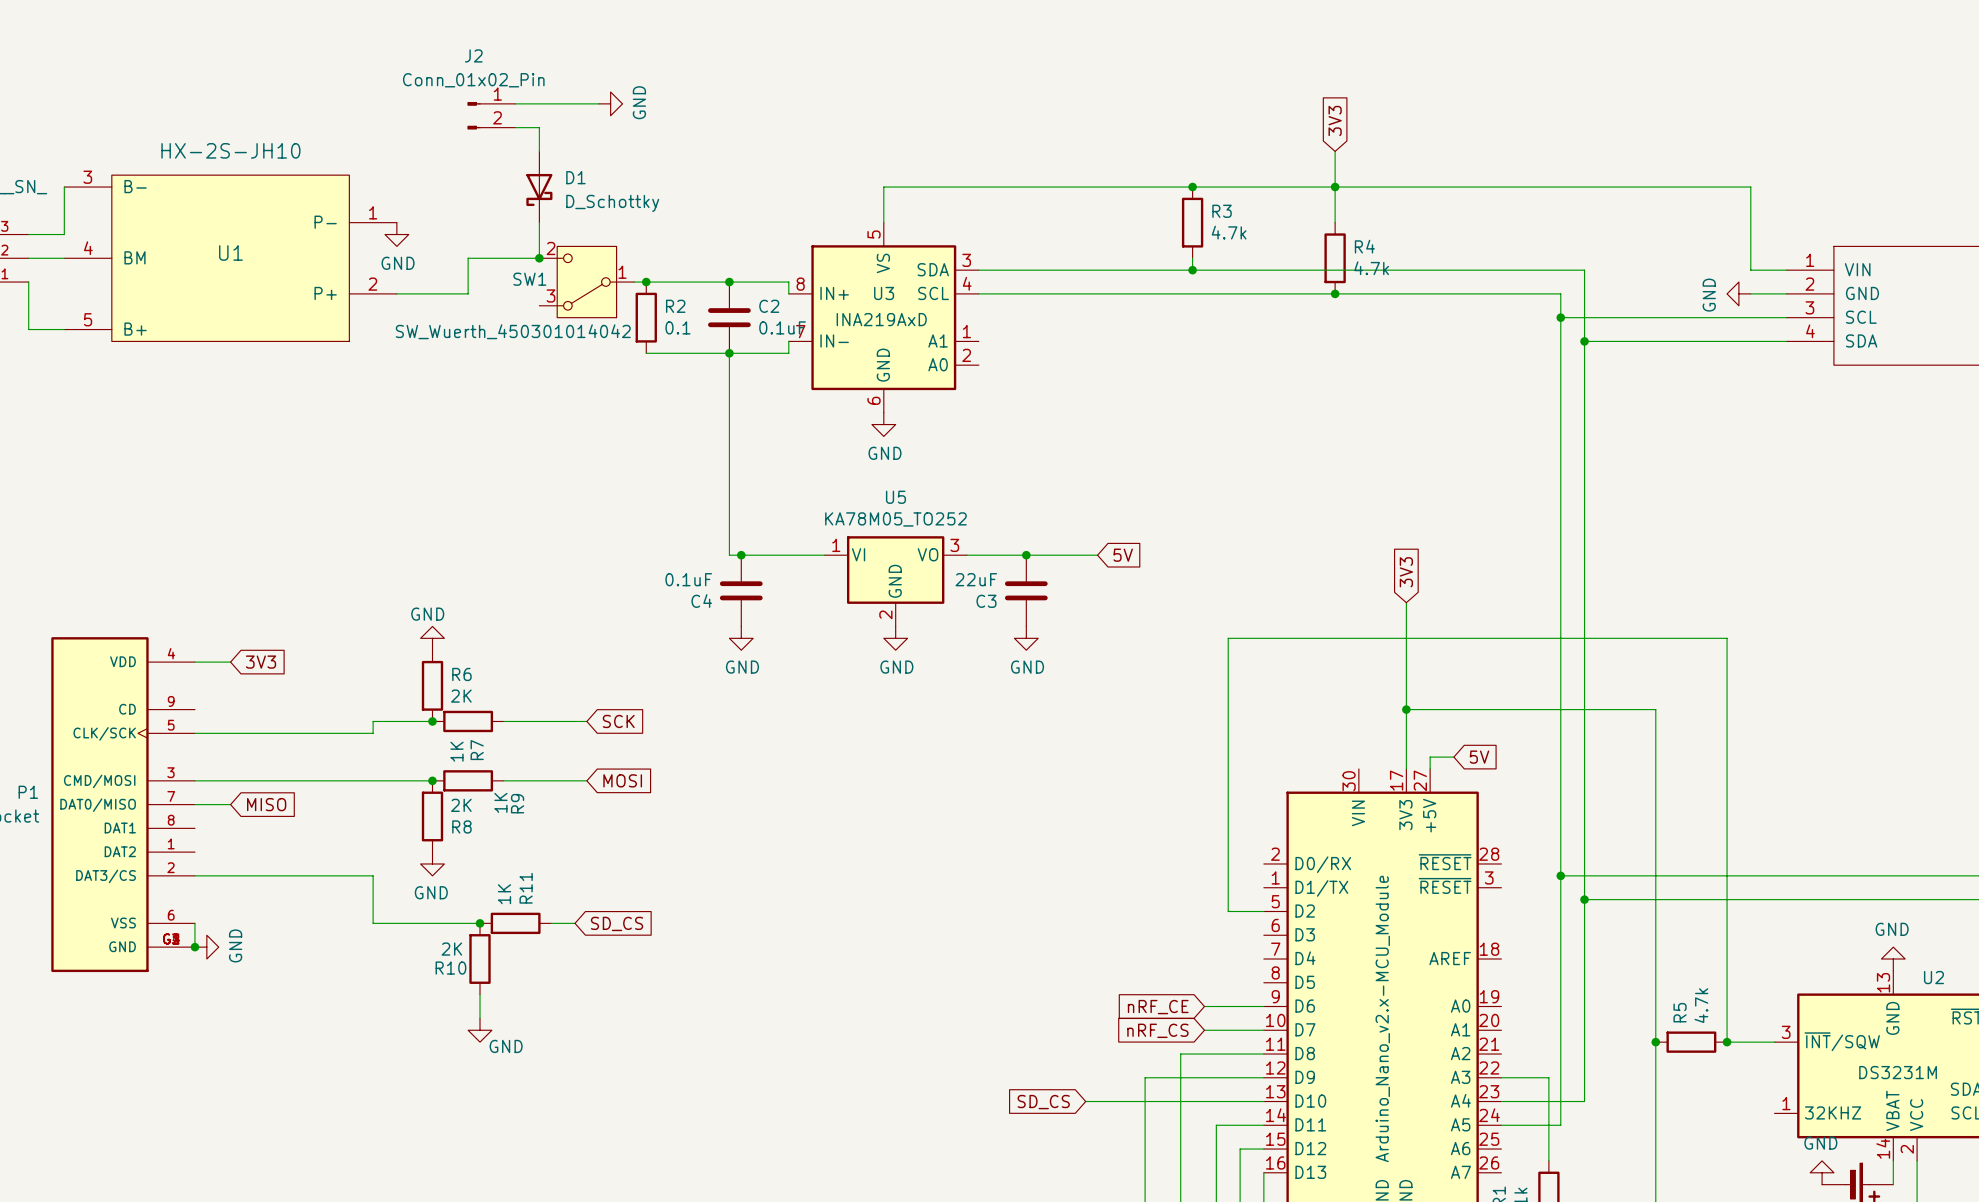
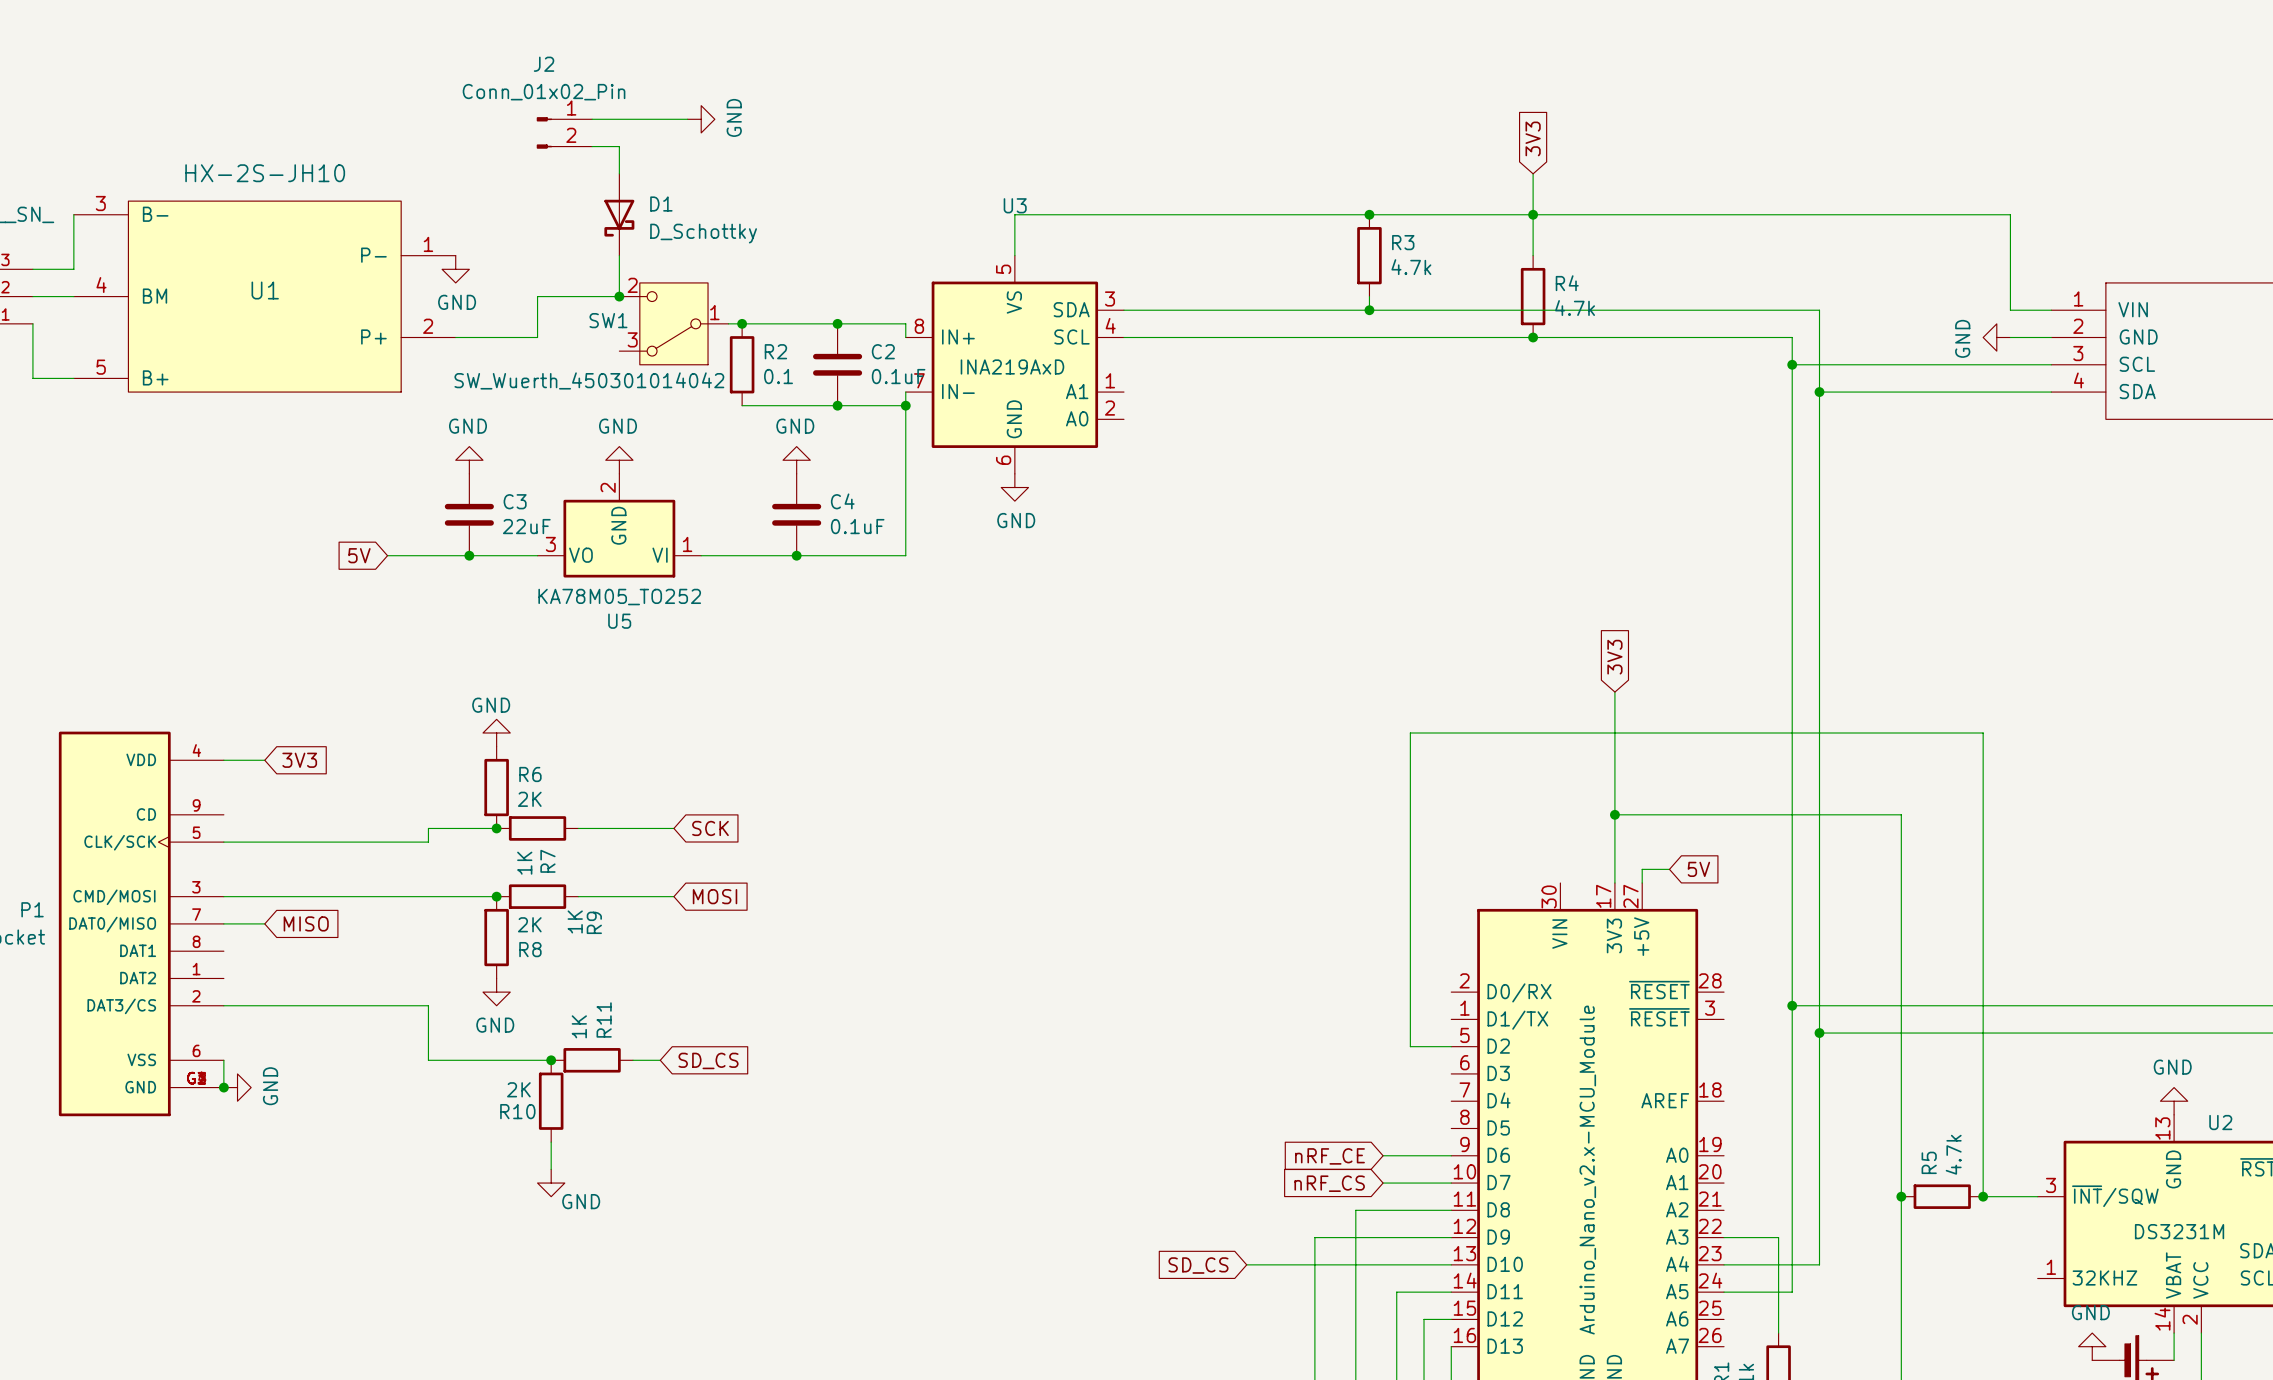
U3 name position: U3 (884, 293) -> U3 (1015, 205)
wire: (729, 353) (729, 555) (824, 555) -> none
wire: none -> (905, 405) (905, 555) (701, 555)
junction: none -> (905, 405)
power symbol: none -> GND (469, 460)
power symbol: none -> GND (619, 460)
power symbol: none -> GND (796, 460)
global label: none -> 5V (359, 555)
wire: none -> (387, 555) (537, 555)
junction: none -> (469, 555)
junction: none -> (796, 555)
junction: (741, 555) -> none
wire: (966, 555) (1097, 555) -> none
junction: (1026, 555) -> none
global label: 5V (1123, 555) -> none
U5 rotation: 0° (895, 570) -> 180° (619, 538)
C4 value position: 0.1uF (688, 579) -> 0.1uF (857, 526)
C3 value position: 22uF (976, 579) -> 22uF (526, 526)
U5 position: (895, 581) -> (619, 525)
C4 position: (741, 590) -> (796, 514)
C3 position: (1026, 590) -> (469, 514)
C4 name position: C4 (701, 601) -> C4 (842, 501)
C3 name position: C3 (986, 601) -> C3 (515, 501)
power symbol: GND (741, 638) -> none
power symbol: GND (895, 638) -> none
power symbol: GND (1026, 638) -> none

